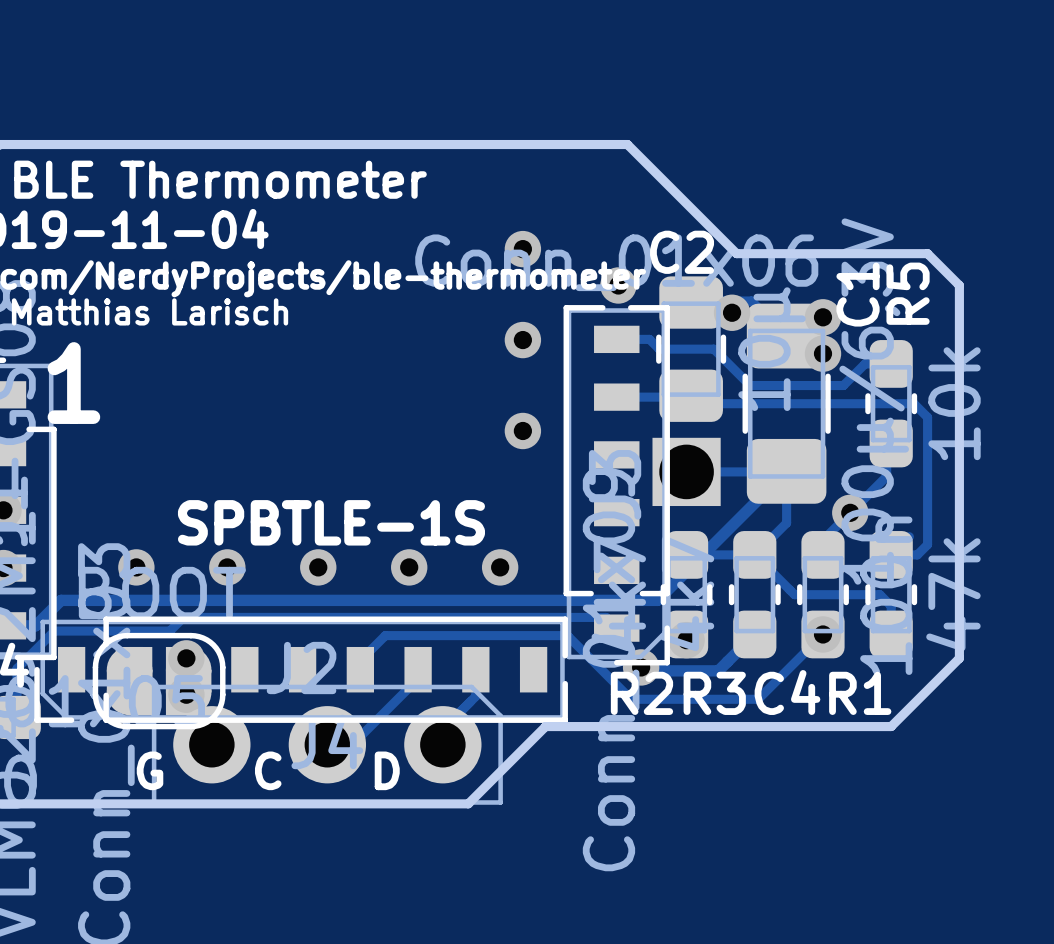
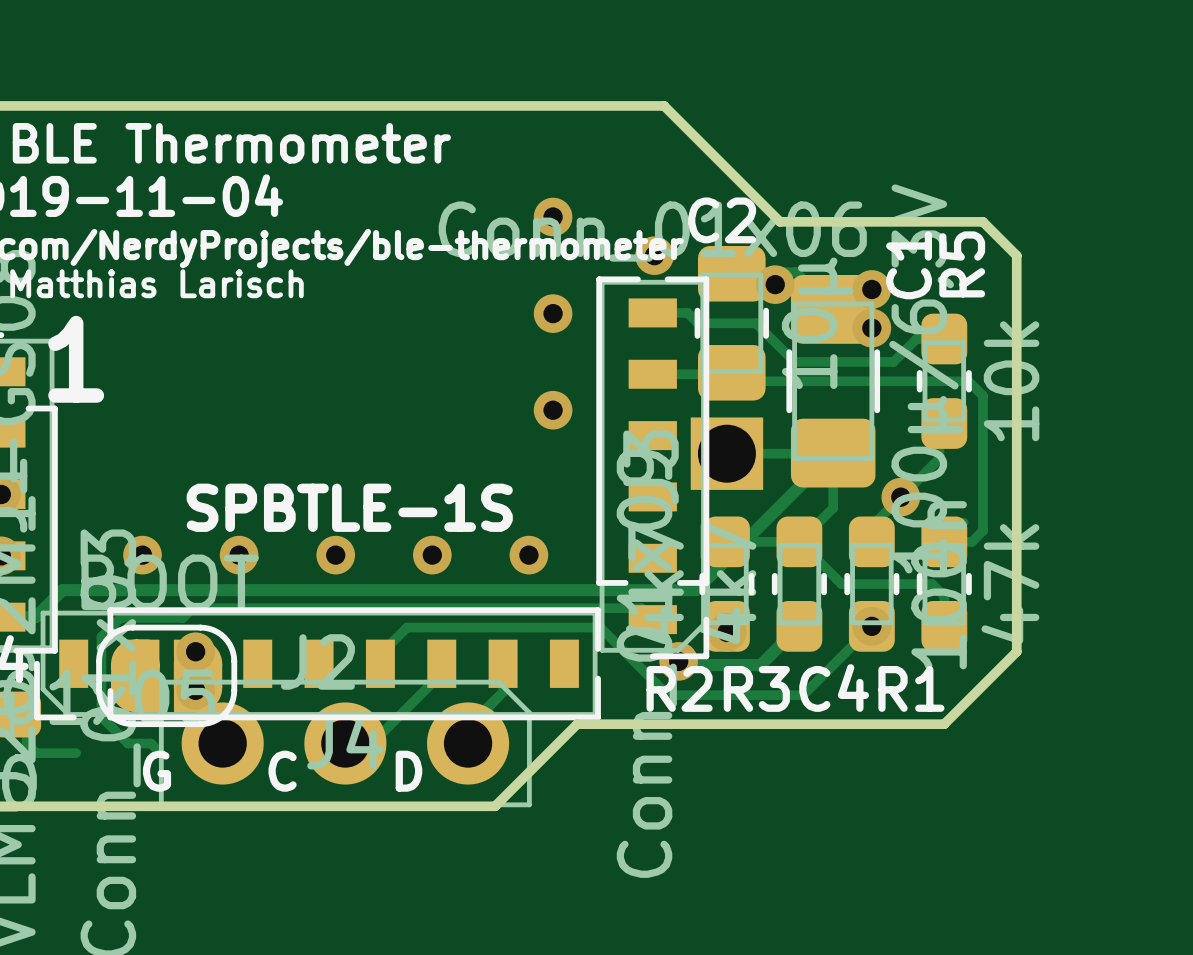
track: (174, 626) (169, 631) (54, 631) (17, 668) (17, 717) -> (182, 617) (120, 617) (101, 637) (101, 716) (128, 743) (150, 743) (160, 753)
track: none -> (26, 709) (26, 743) (36, 753) (76, 753)

